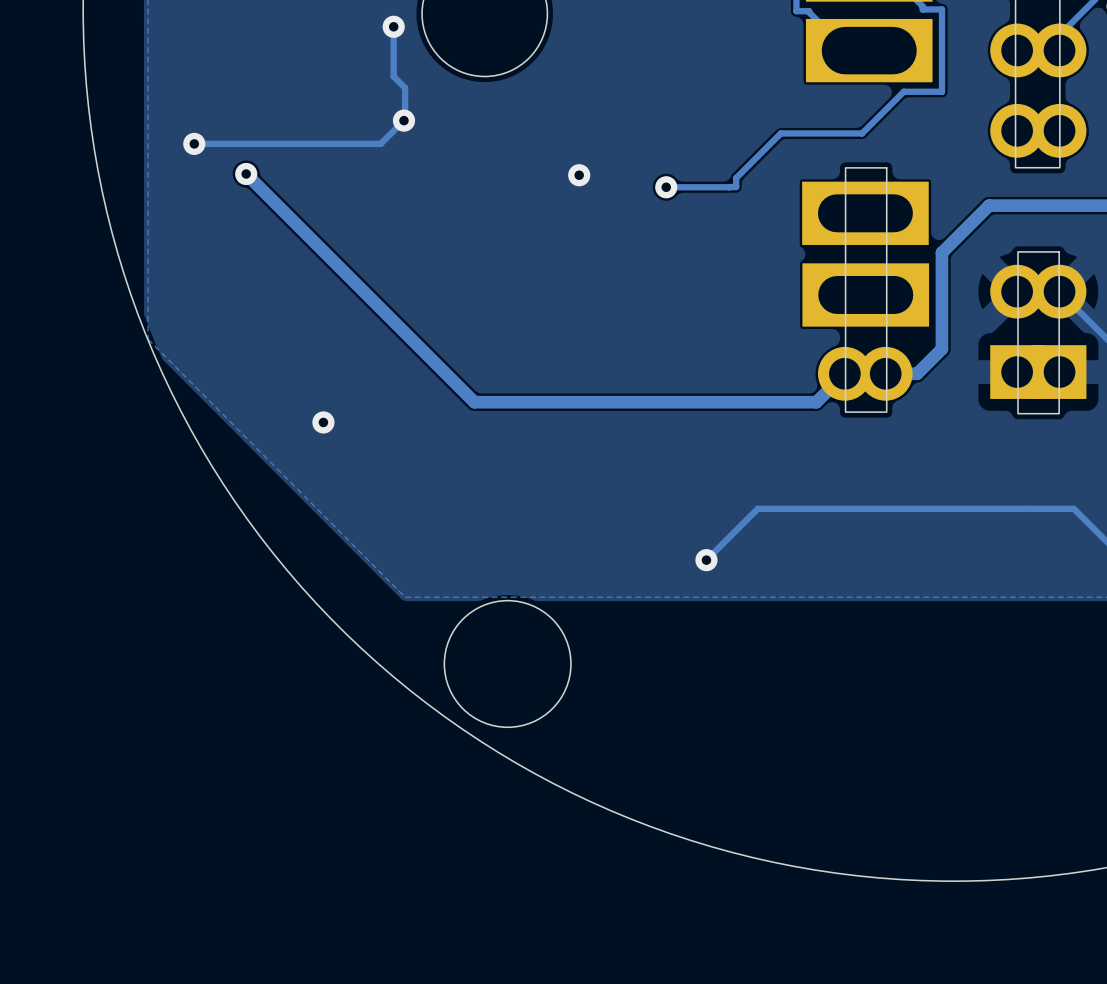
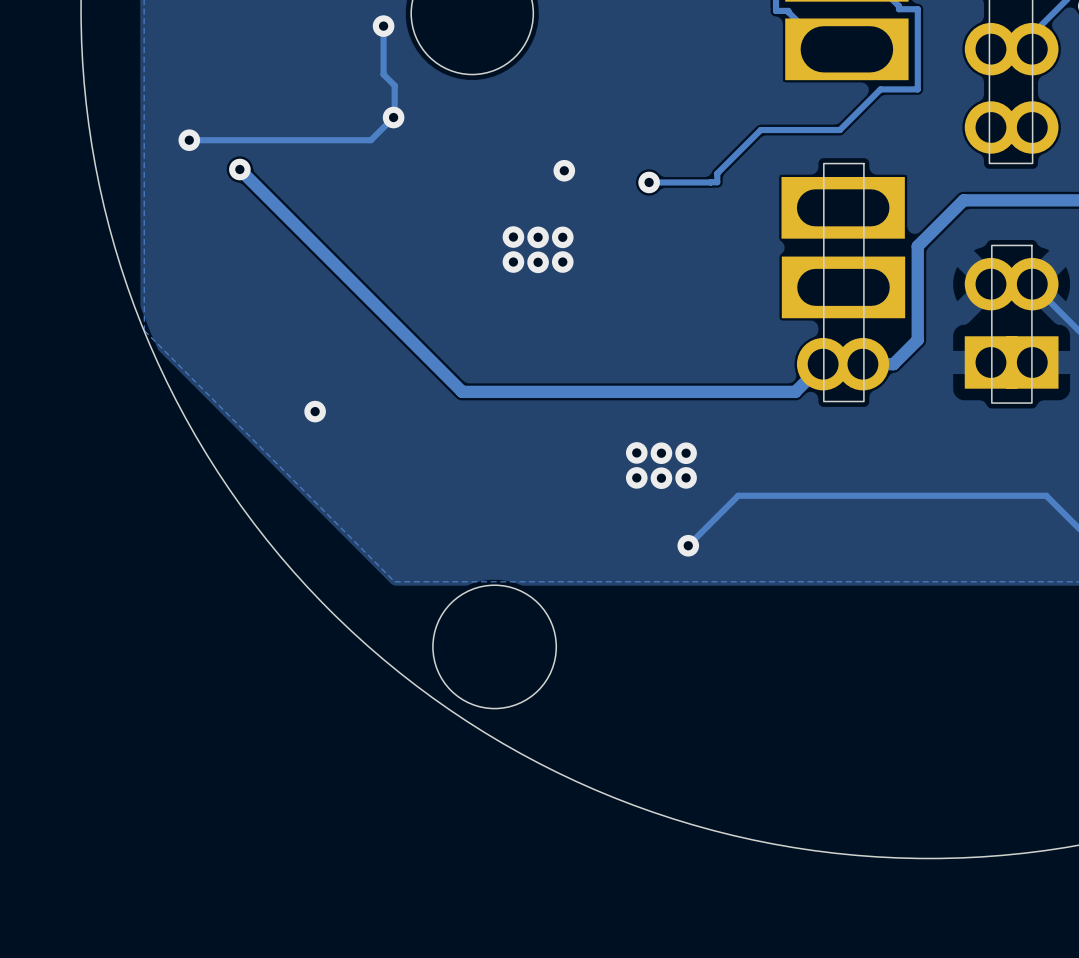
via: none -> (513, 237)
via: none -> (538, 237)
via: none -> (562, 237)
via: none -> (513, 262)
via: none -> (562, 262)
via: none -> (538, 262)
via: none -> (636, 452)
via: none -> (661, 453)
via: none -> (686, 453)
via: none -> (636, 477)
via: none -> (661, 478)
via: none -> (686, 477)

